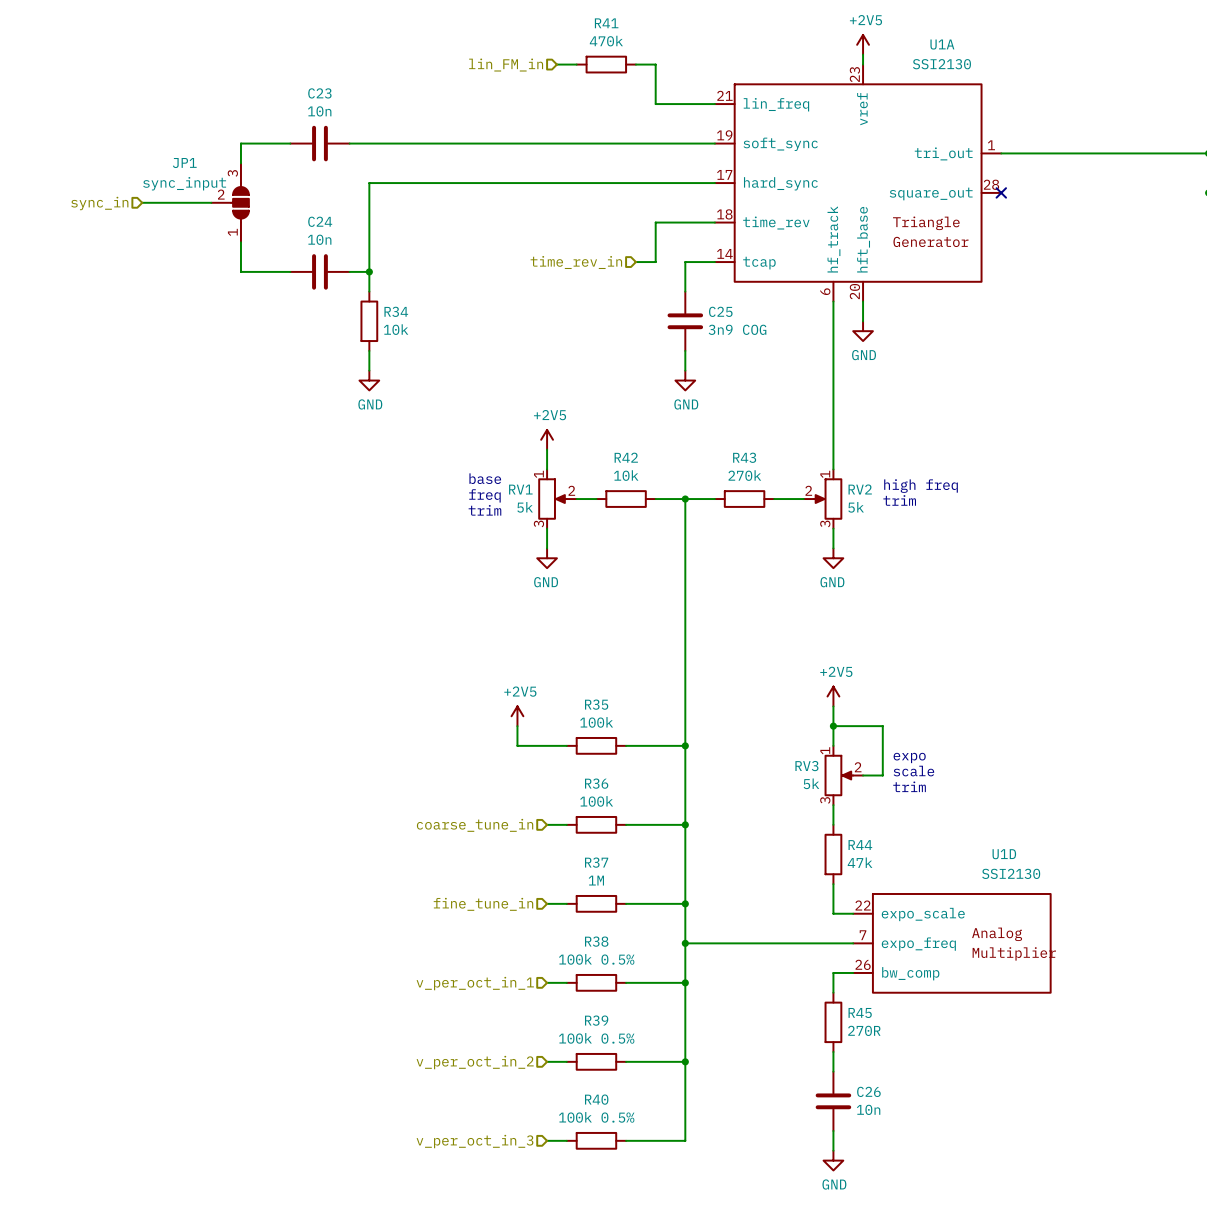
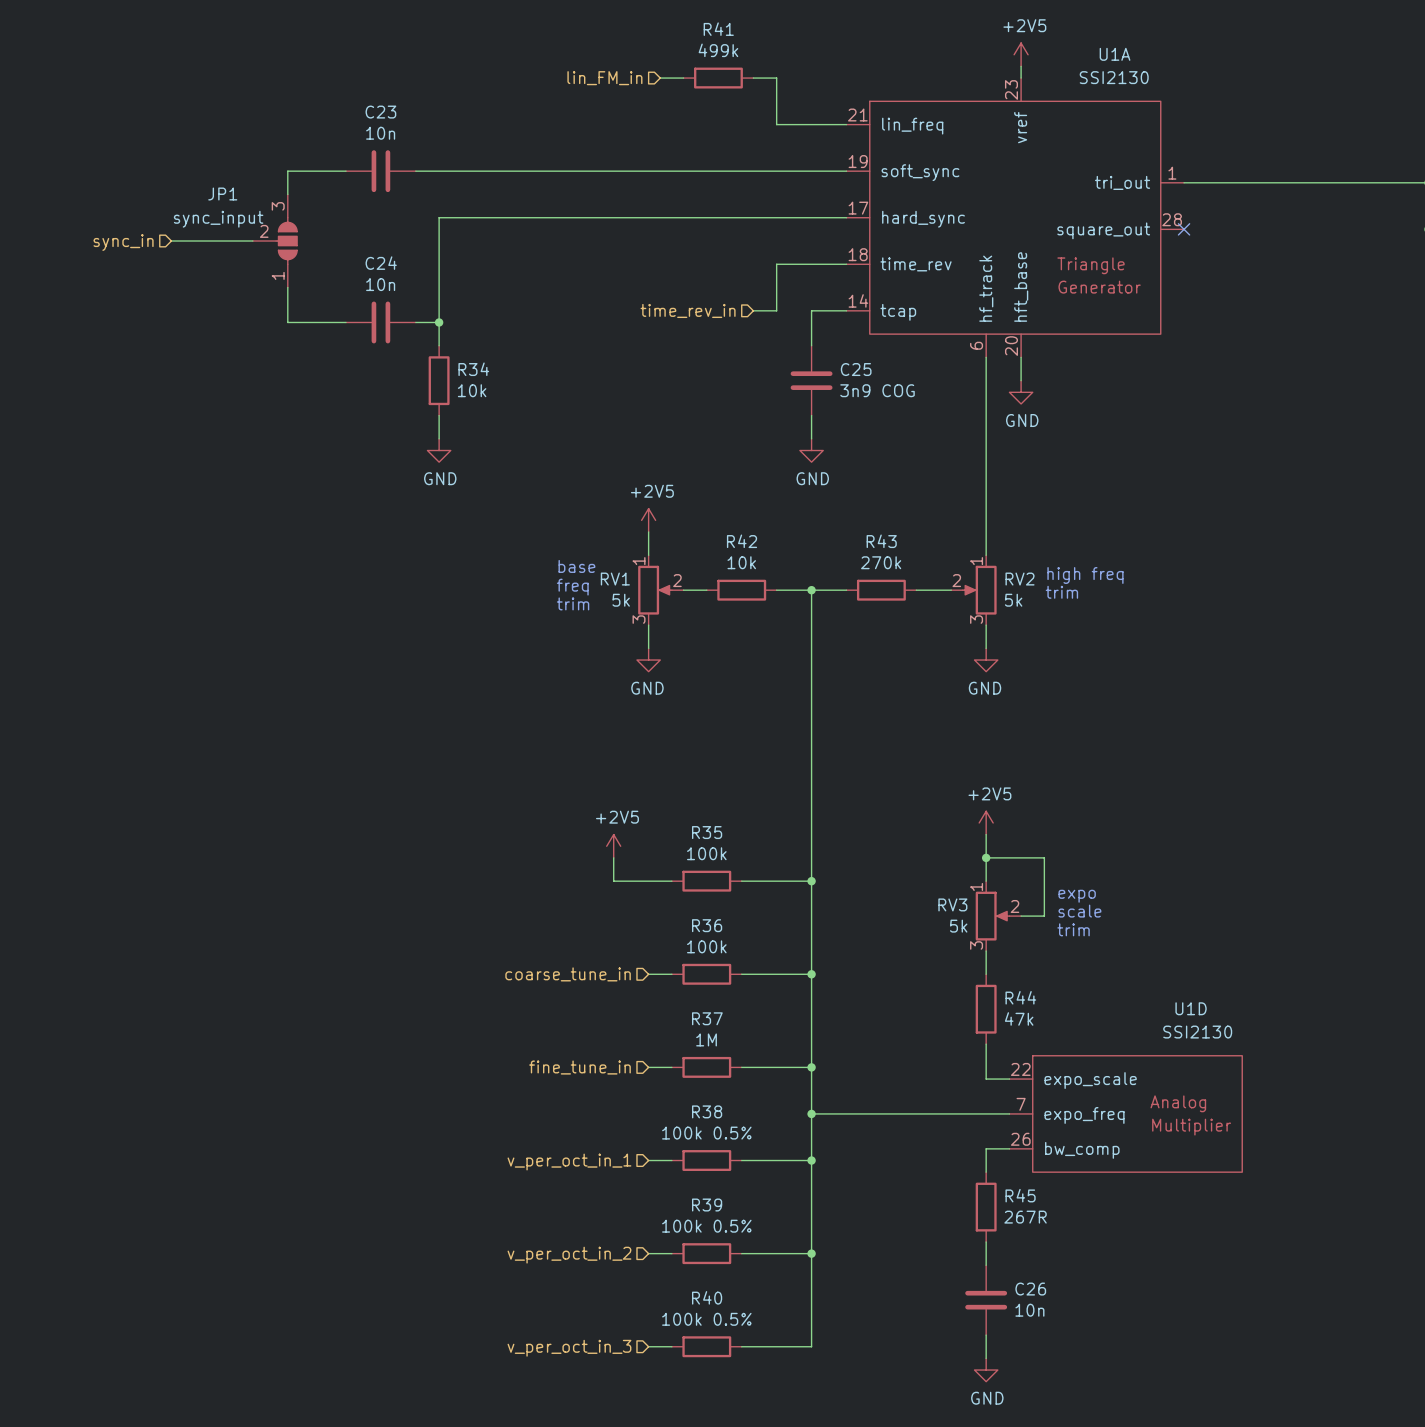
R41 value: 470k (606, 41) -> 499k (718, 50)
R45 value: 270R (864, 1030) -> 267R (1025, 1217)

